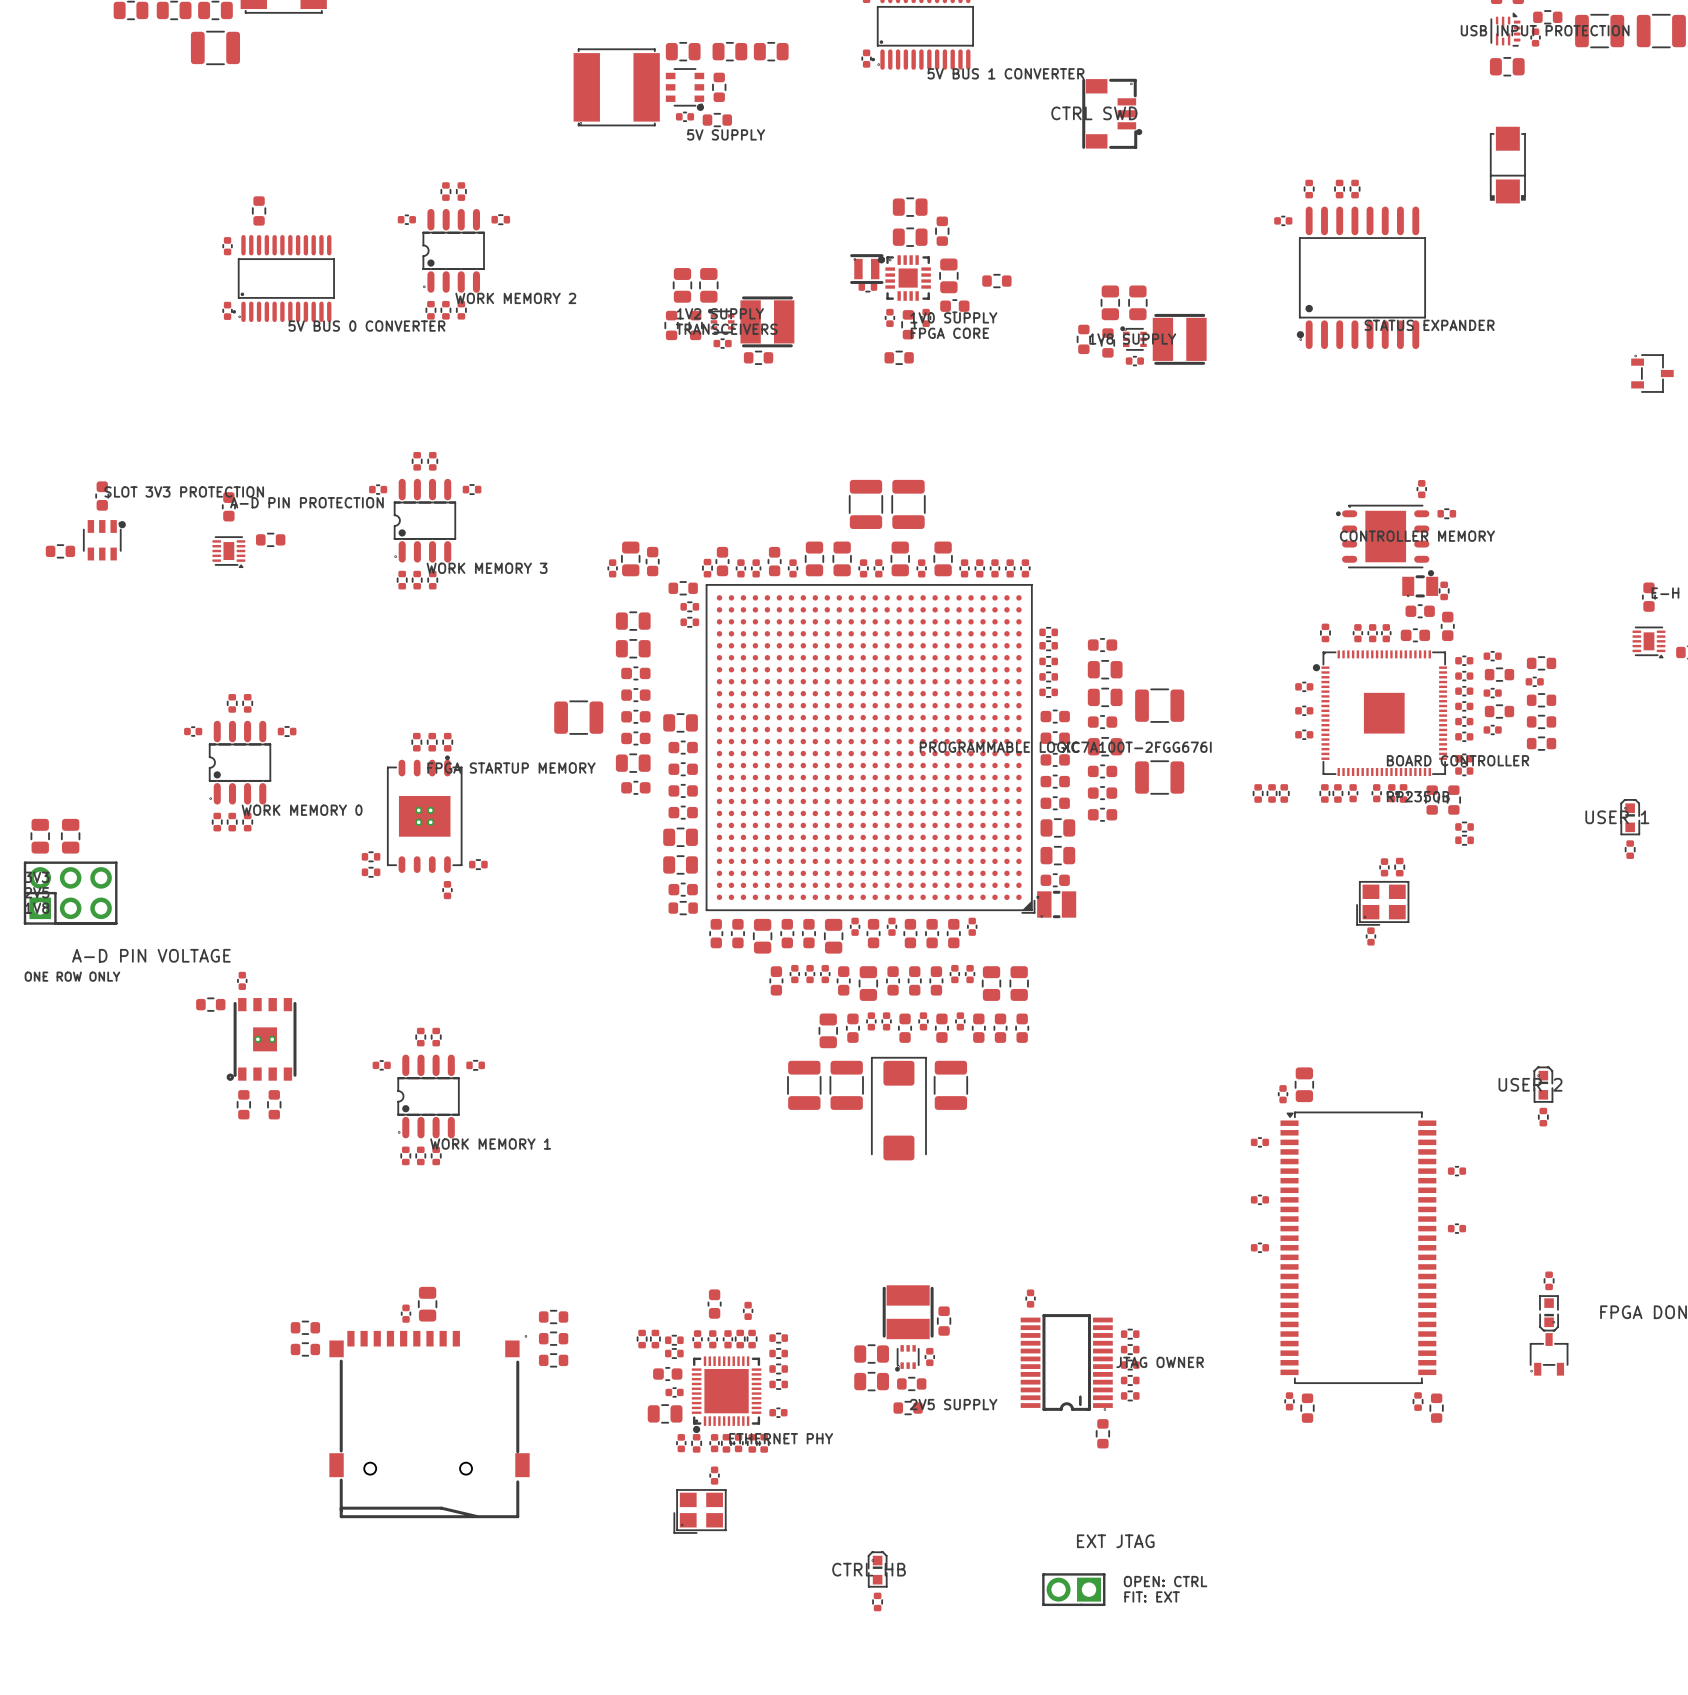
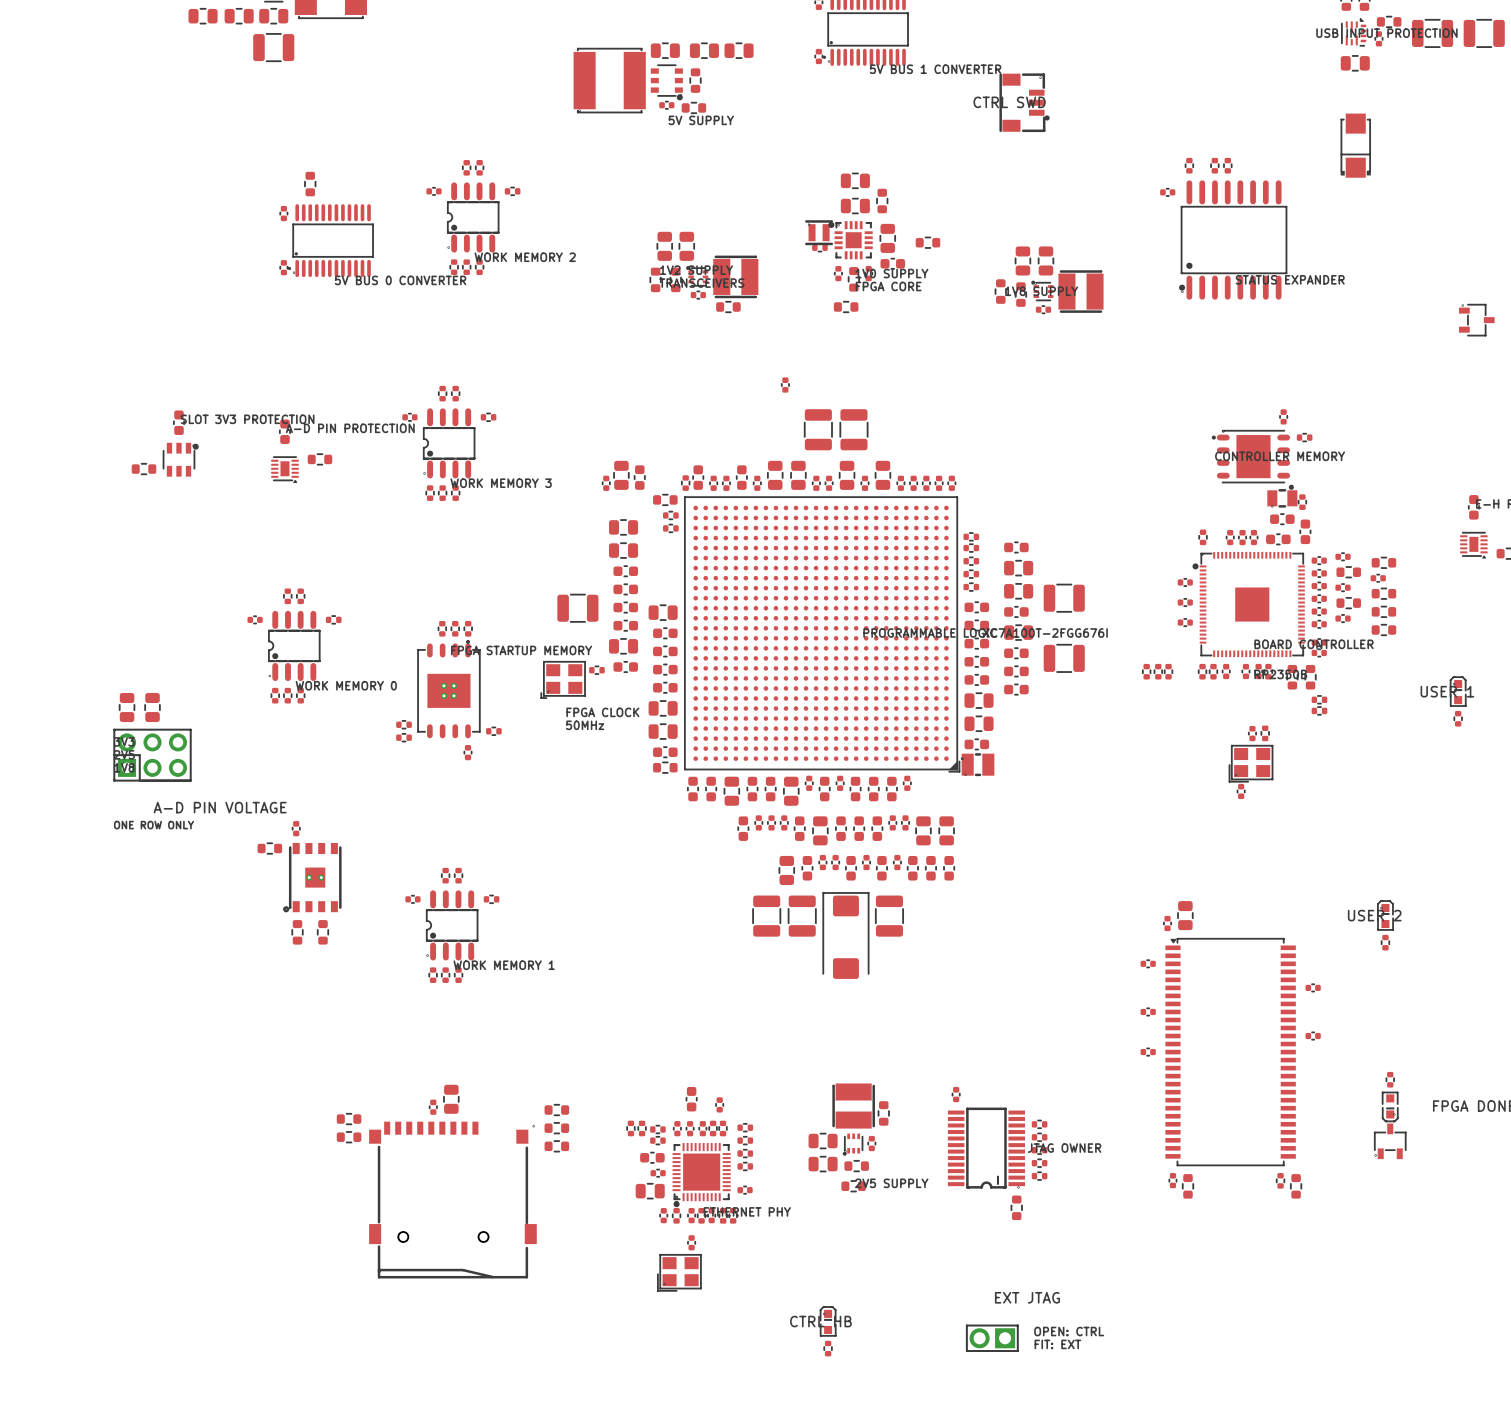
part: none -> (785, 385)
part: none -> (596, 670)
part: none -> (563, 679)

